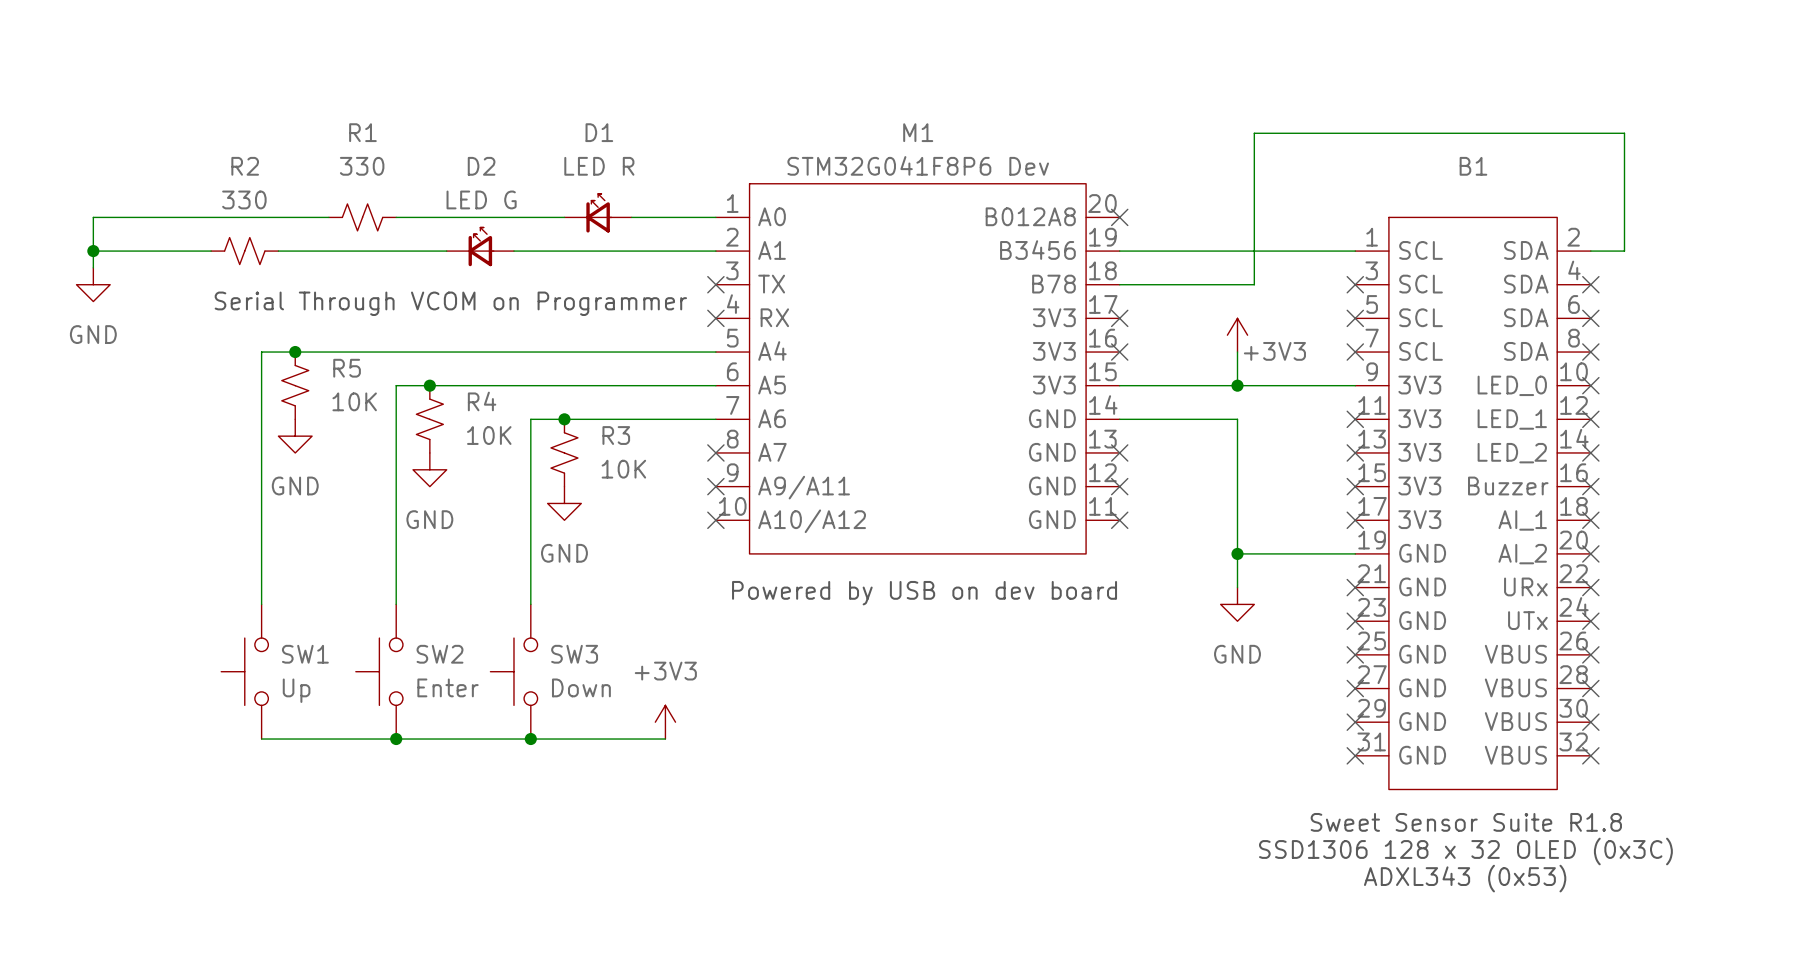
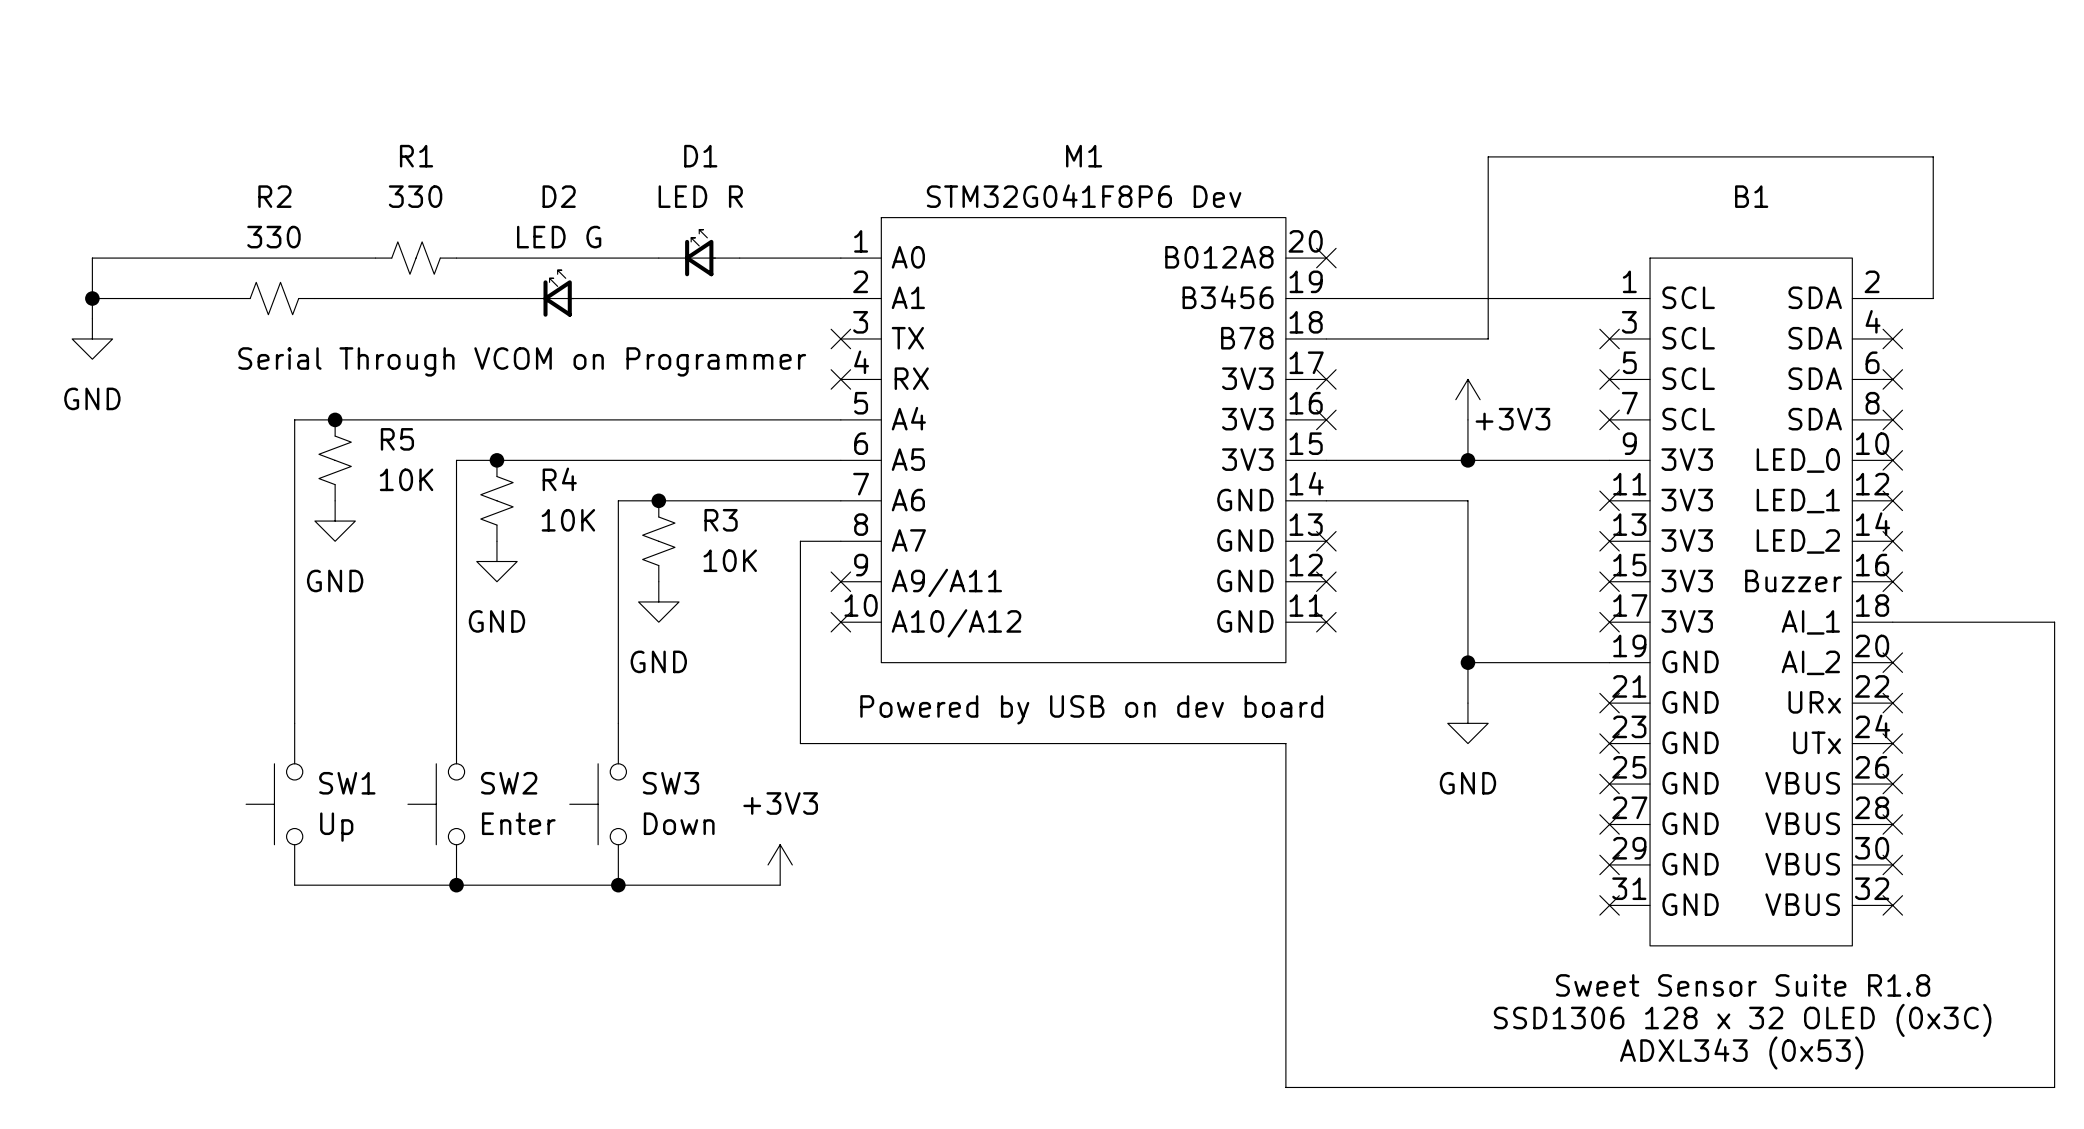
wire: none -> (840, 541) (800, 541) (800, 743) (1285, 743) (1285, 1087) (2054, 1087) (2054, 622) (1892, 622)
no-connect mark: (715, 452) -> none
no-connect mark: (1590, 520) -> none

